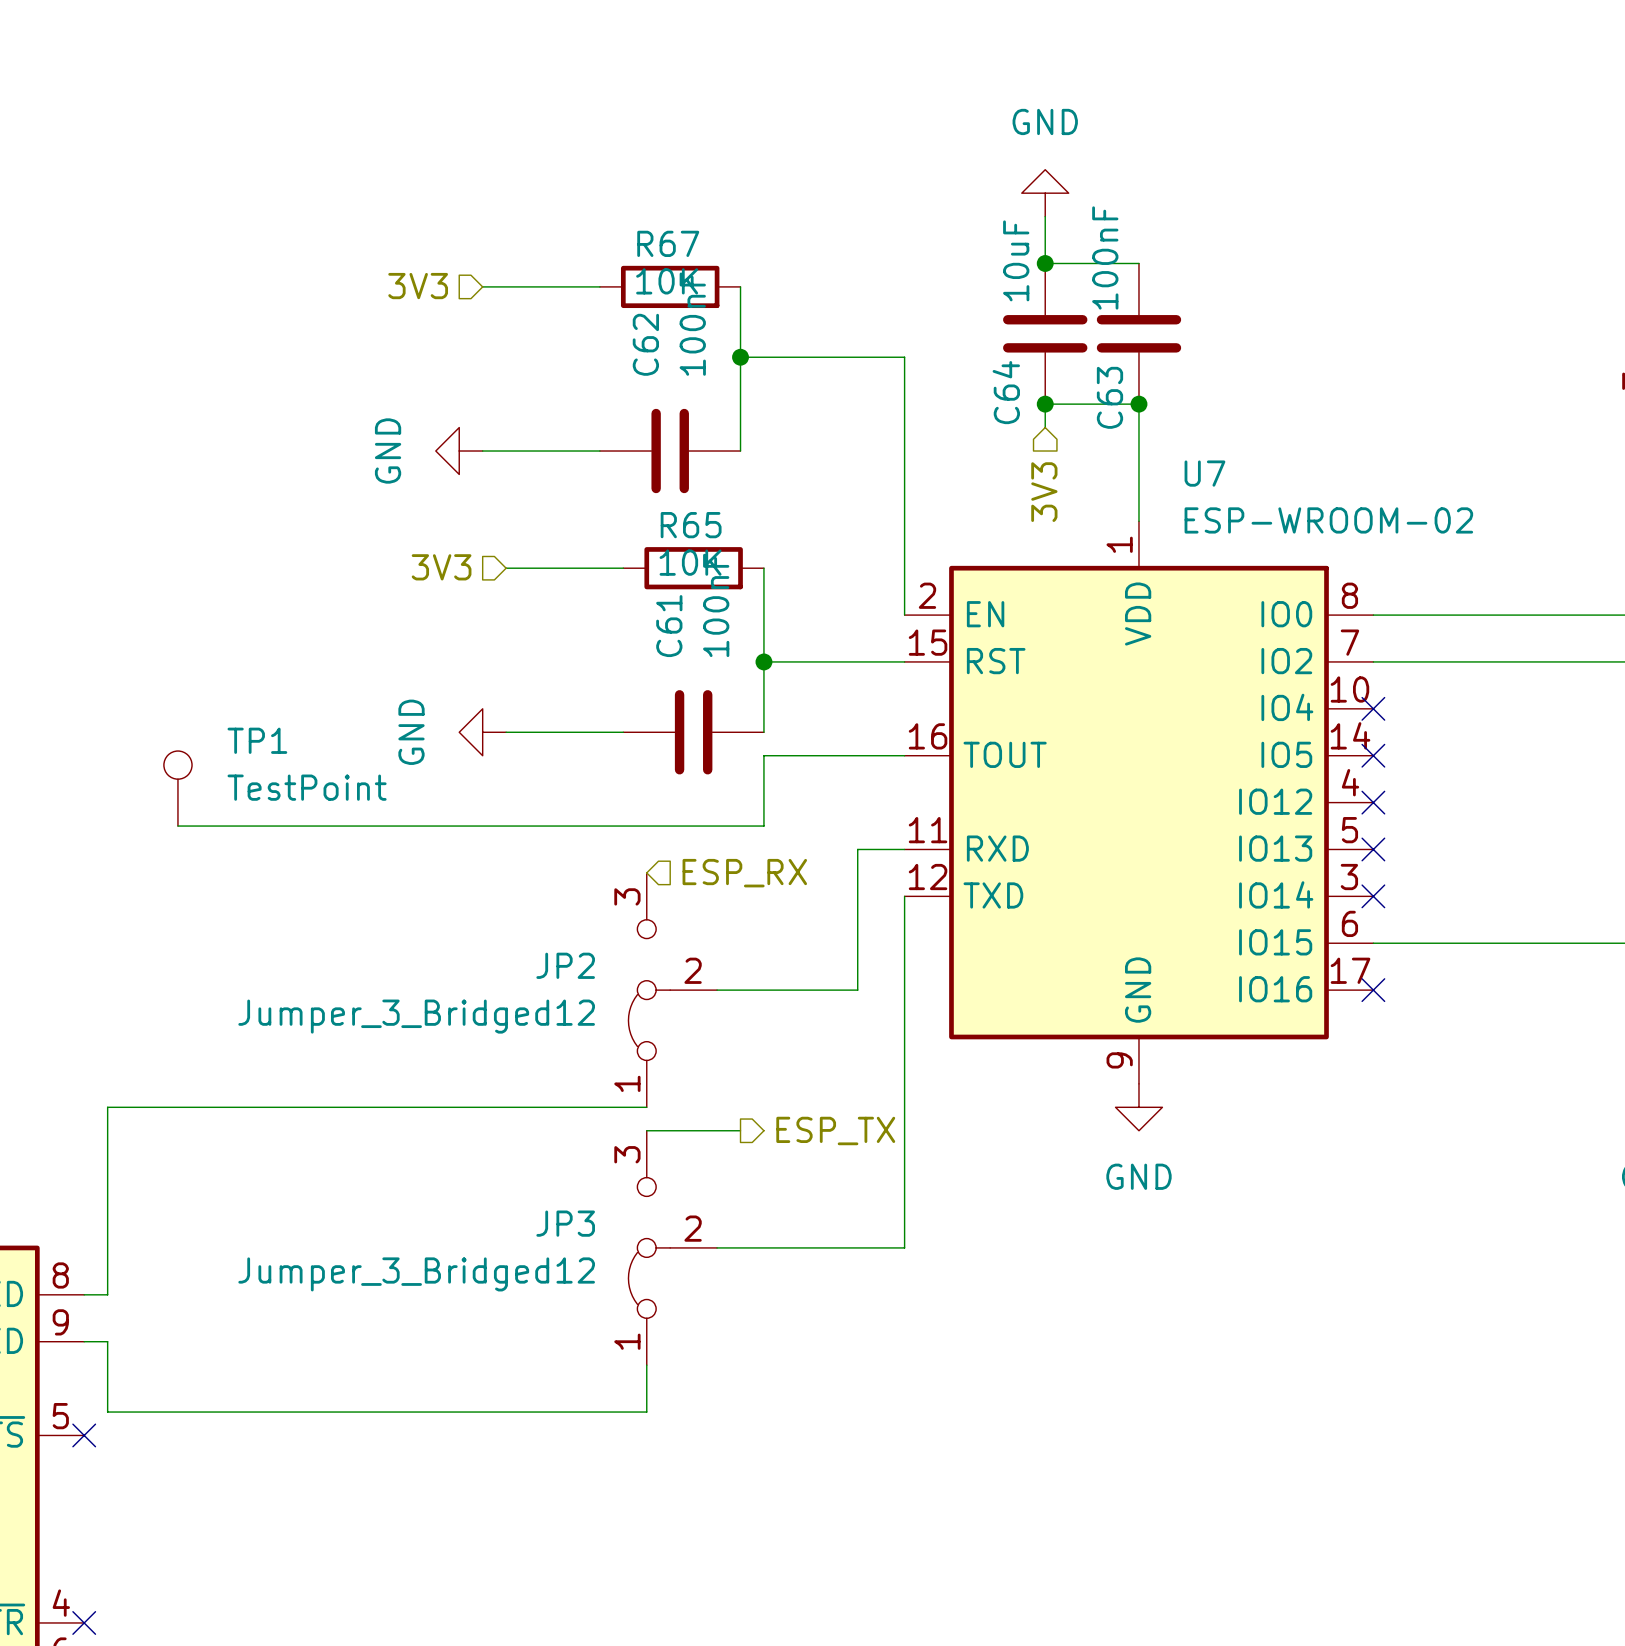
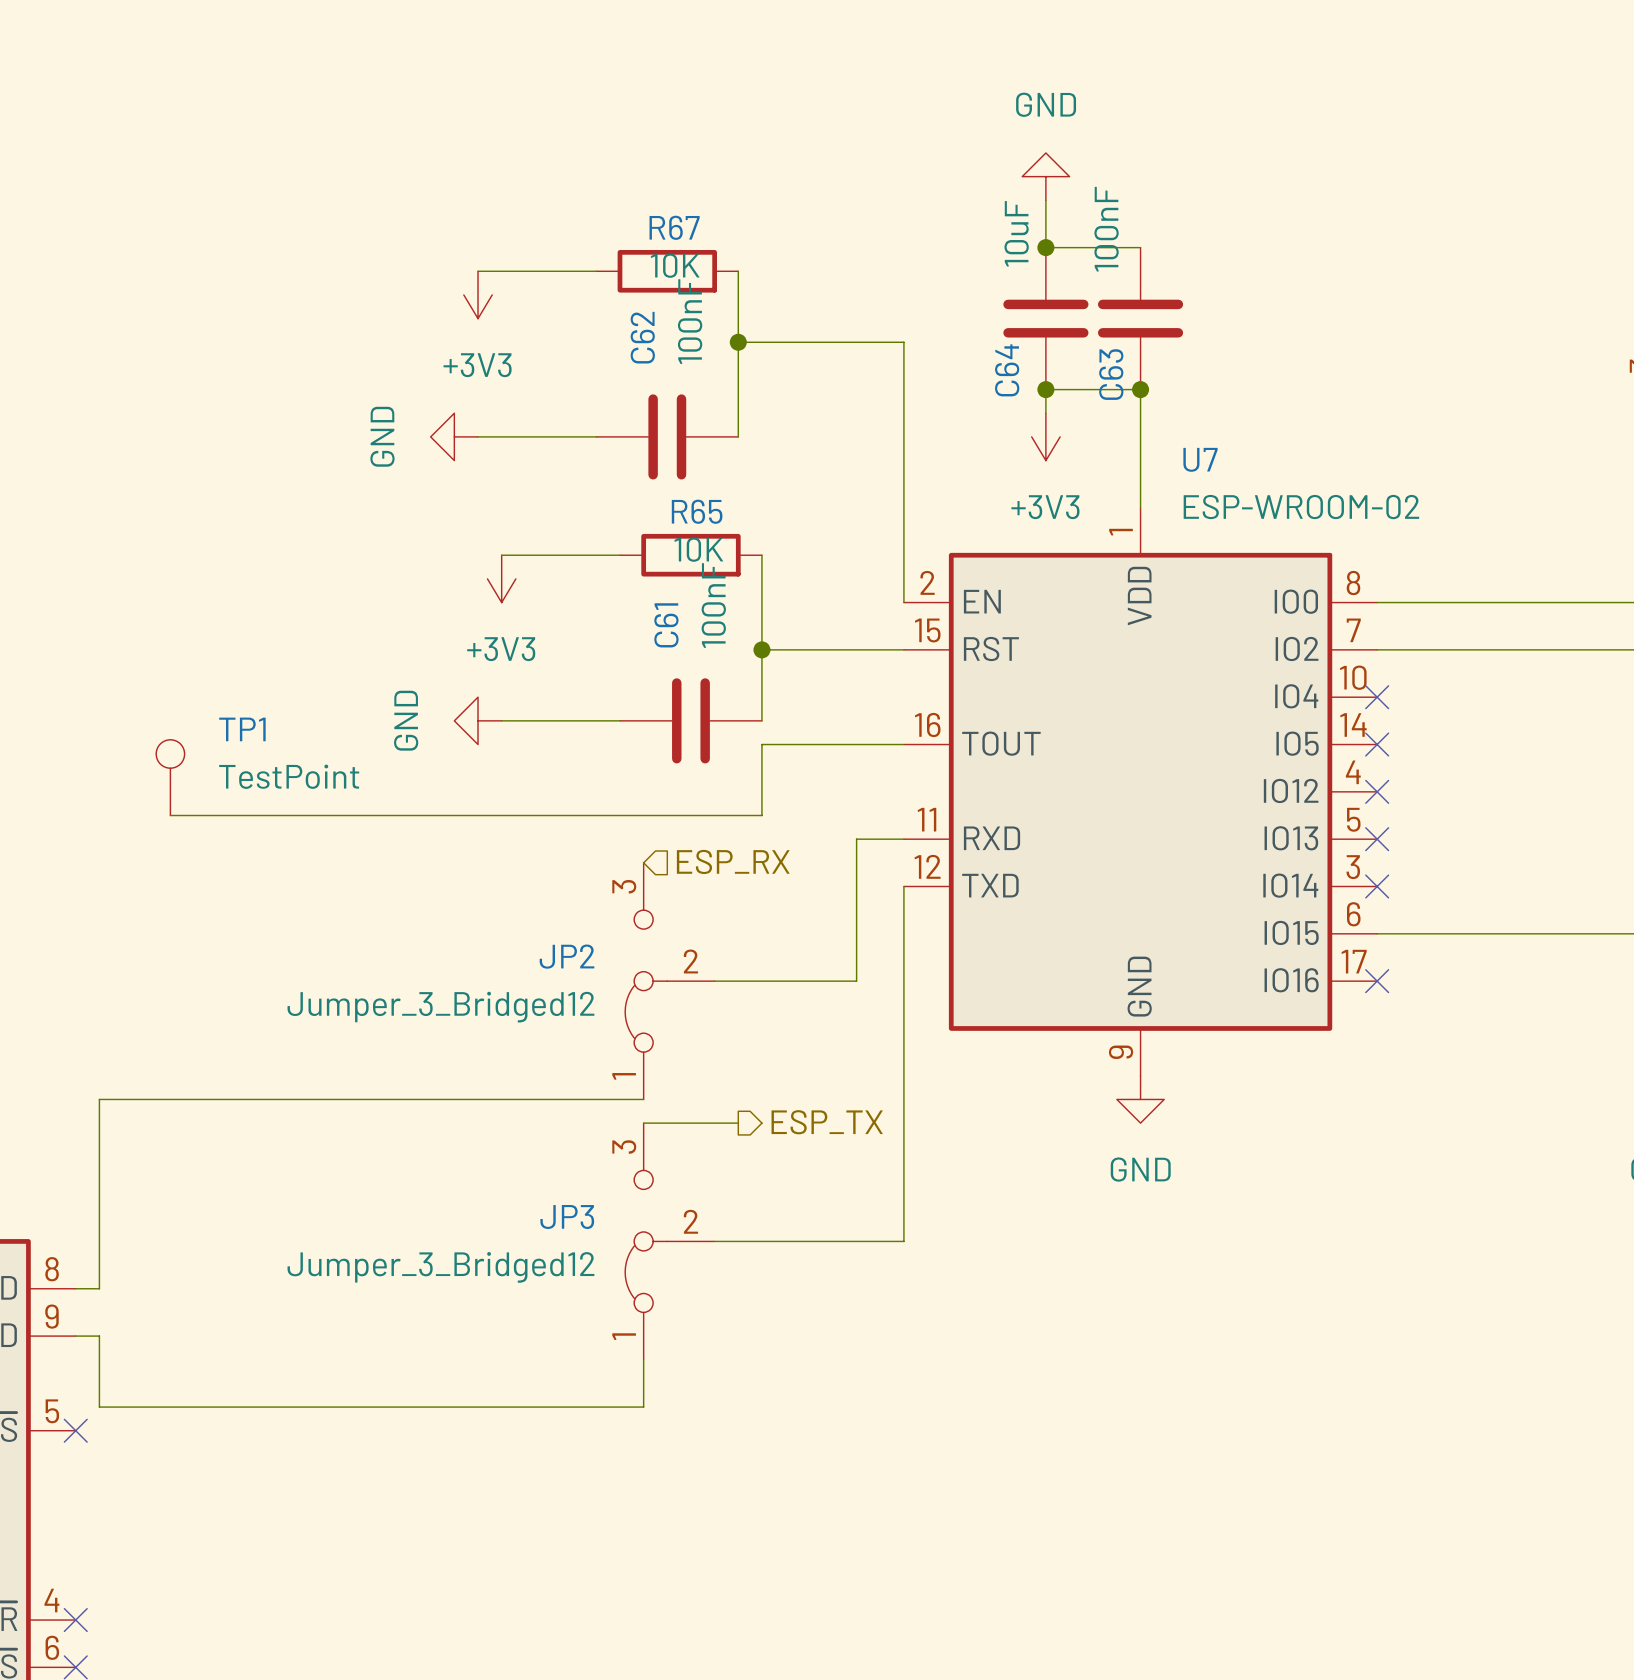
hierarchical label: 3V3 (418, 286) -> none
power symbol: none -> +3V3 (478, 294)
power symbol: none -> +3V3 (1045, 436)
hierarchical label: 3V3 (1044, 492) -> none
hierarchical label: 3V3 (441, 567) -> none
power symbol: none -> +3V3 (501, 578)

